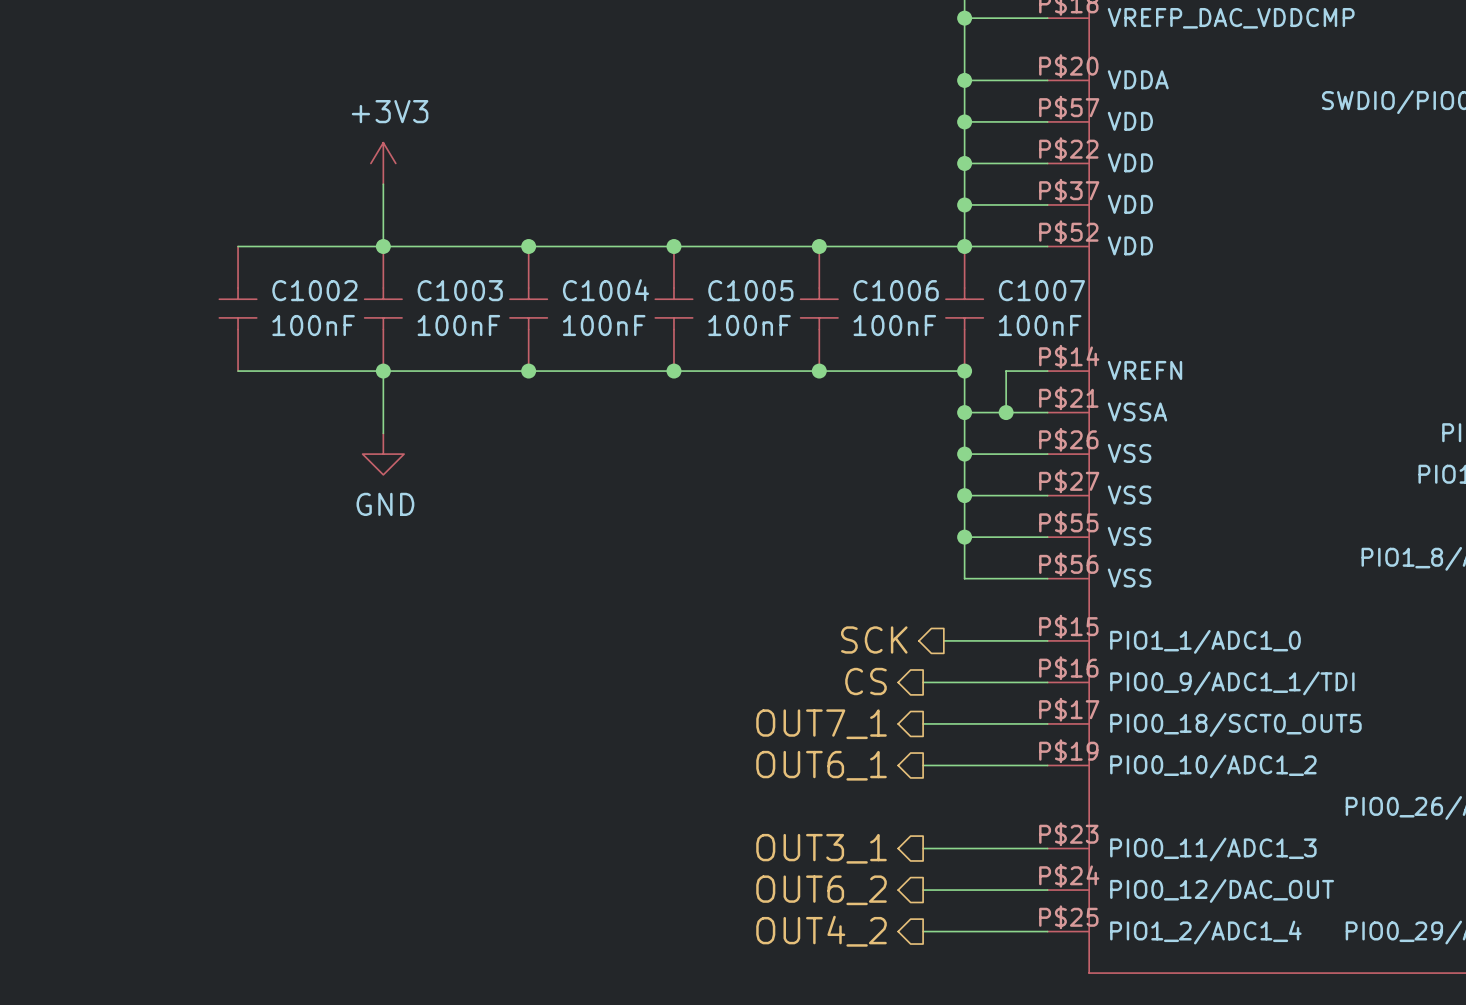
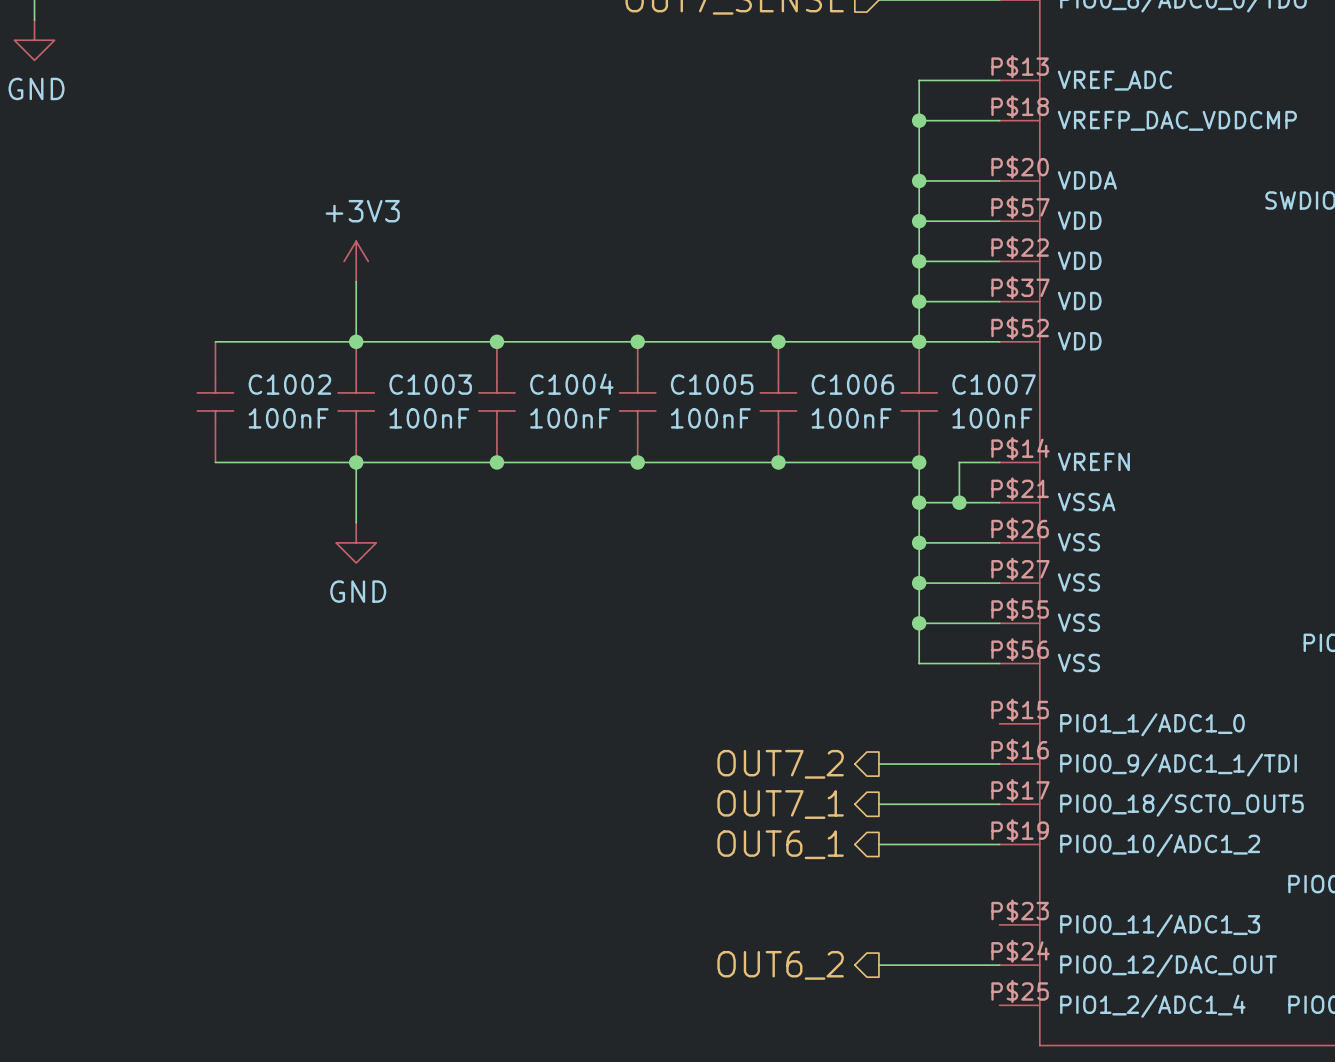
hierarchical label: SCK (874, 640) -> none
wire: (943, 640) (1047, 640) -> none
hierarchical label: CS (866, 681) -> OUT7_2 (780, 764)
hierarchical label: OUT3_1 (821, 848) -> none
wire: (923, 848) (1047, 848) -> none
hierarchical label: OUT4_2 (821, 931) -> none
wire: (923, 931) (1047, 931) -> none

